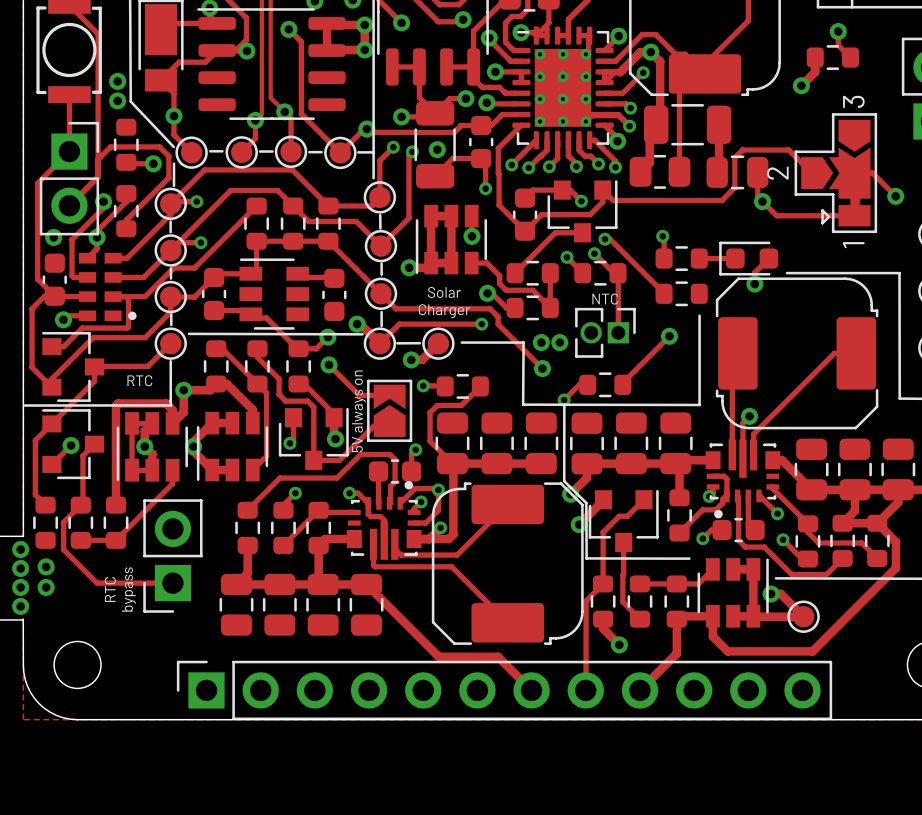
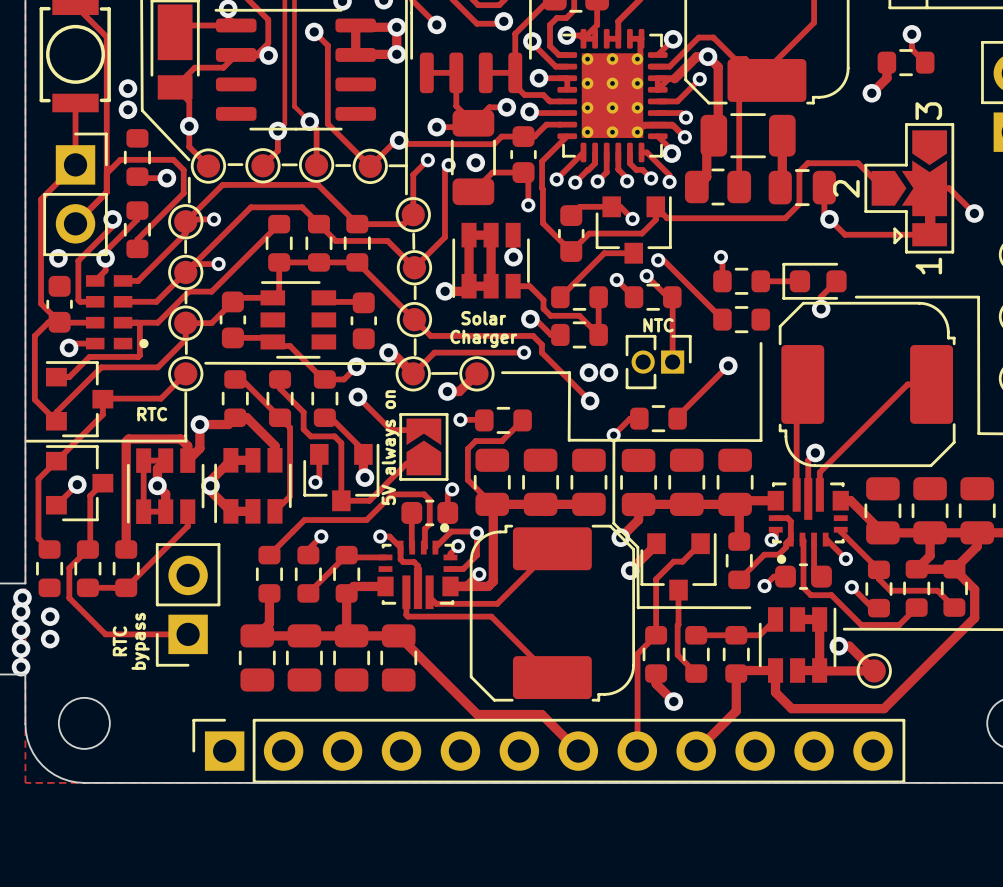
via: none -> (21, 611)
via: (20, 568) -> none
via: none -> (21, 630)
via: (20, 587) -> none
via: none -> (21, 648)
via: (20, 606) -> none
via: none -> (21, 667)

